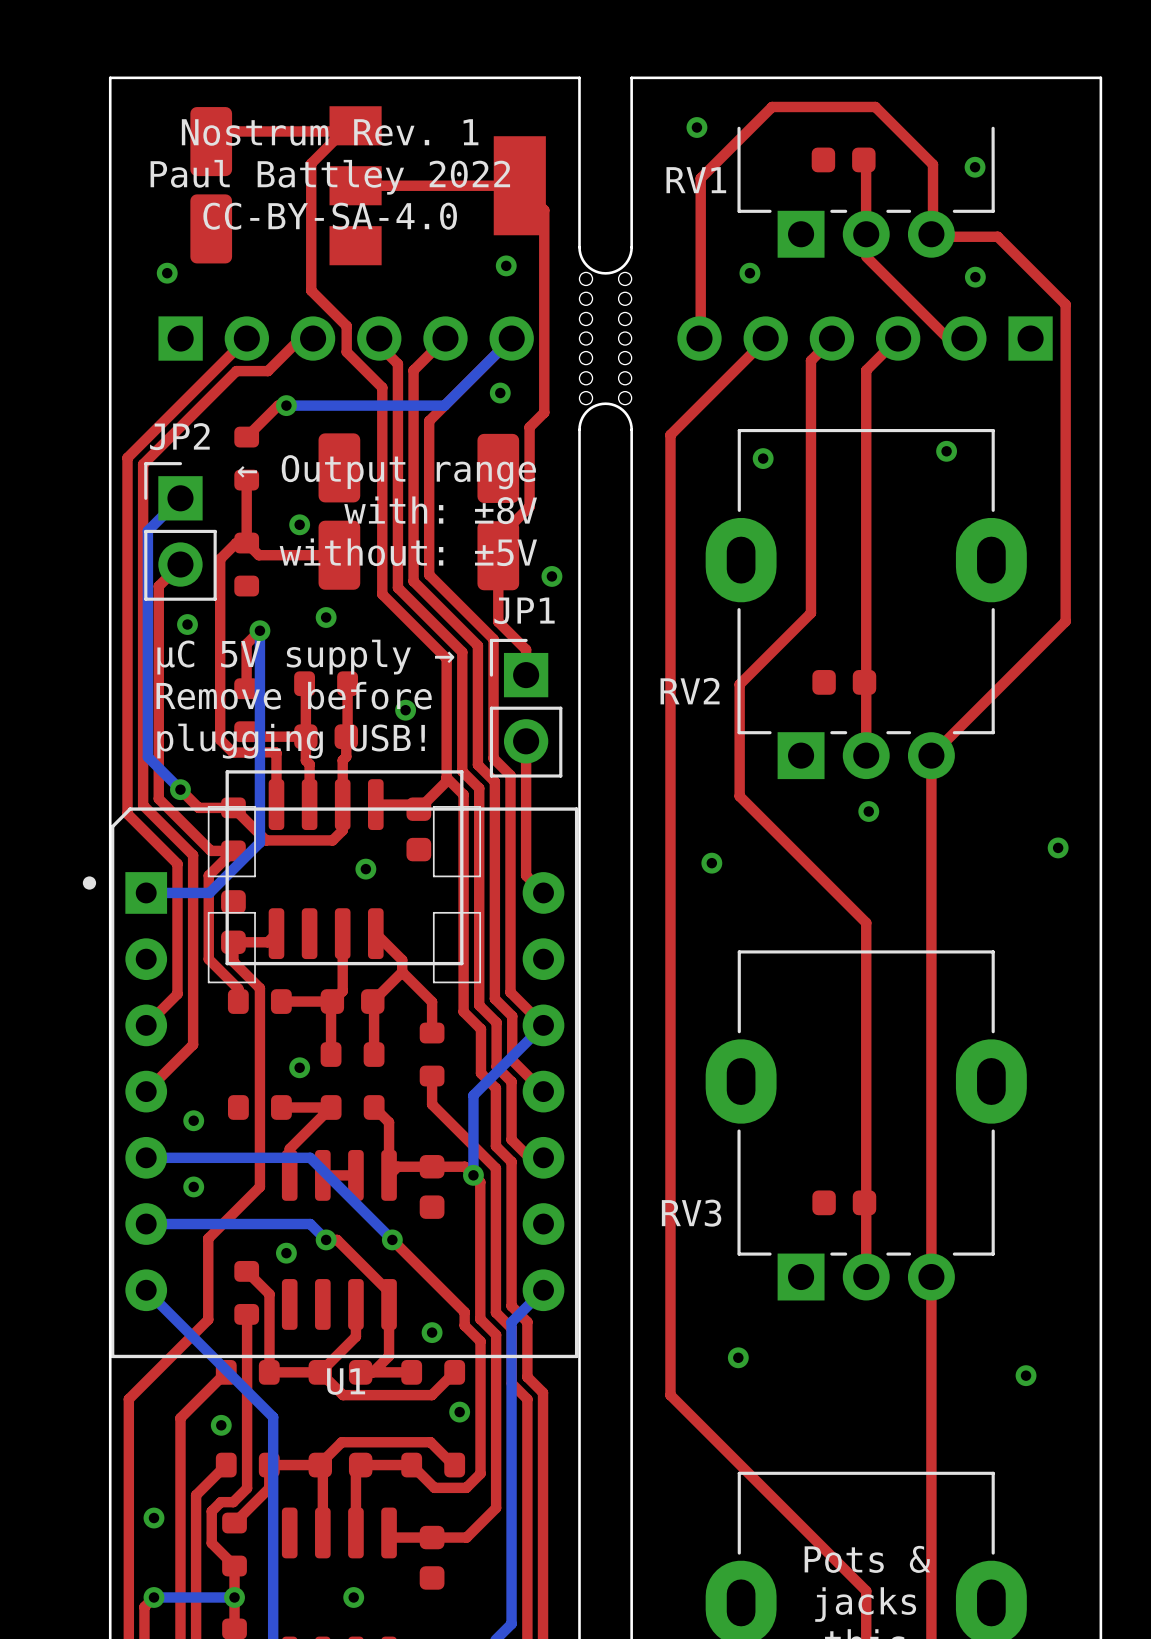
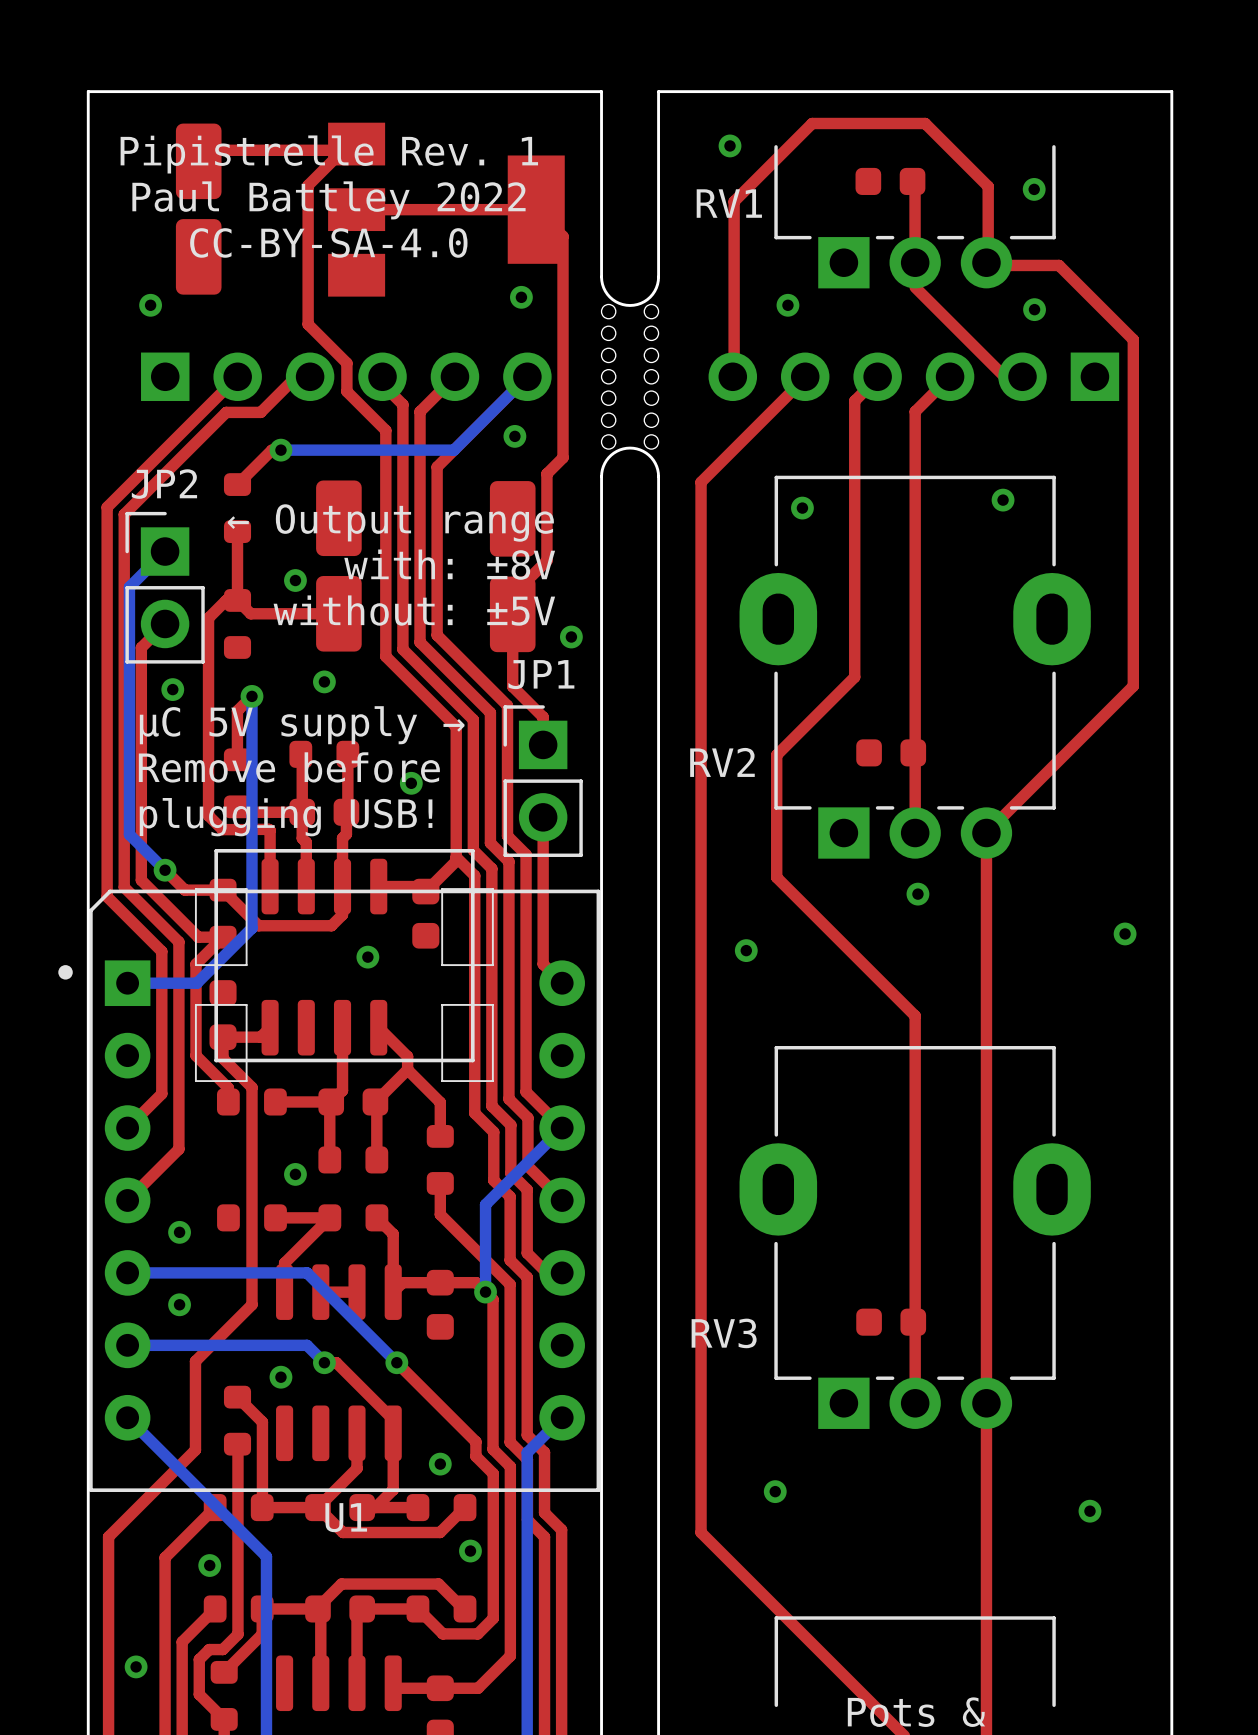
text: Nostrum Rev. 1 (330, 132) -> Pipistrelle Rev. 1 (329, 154)

